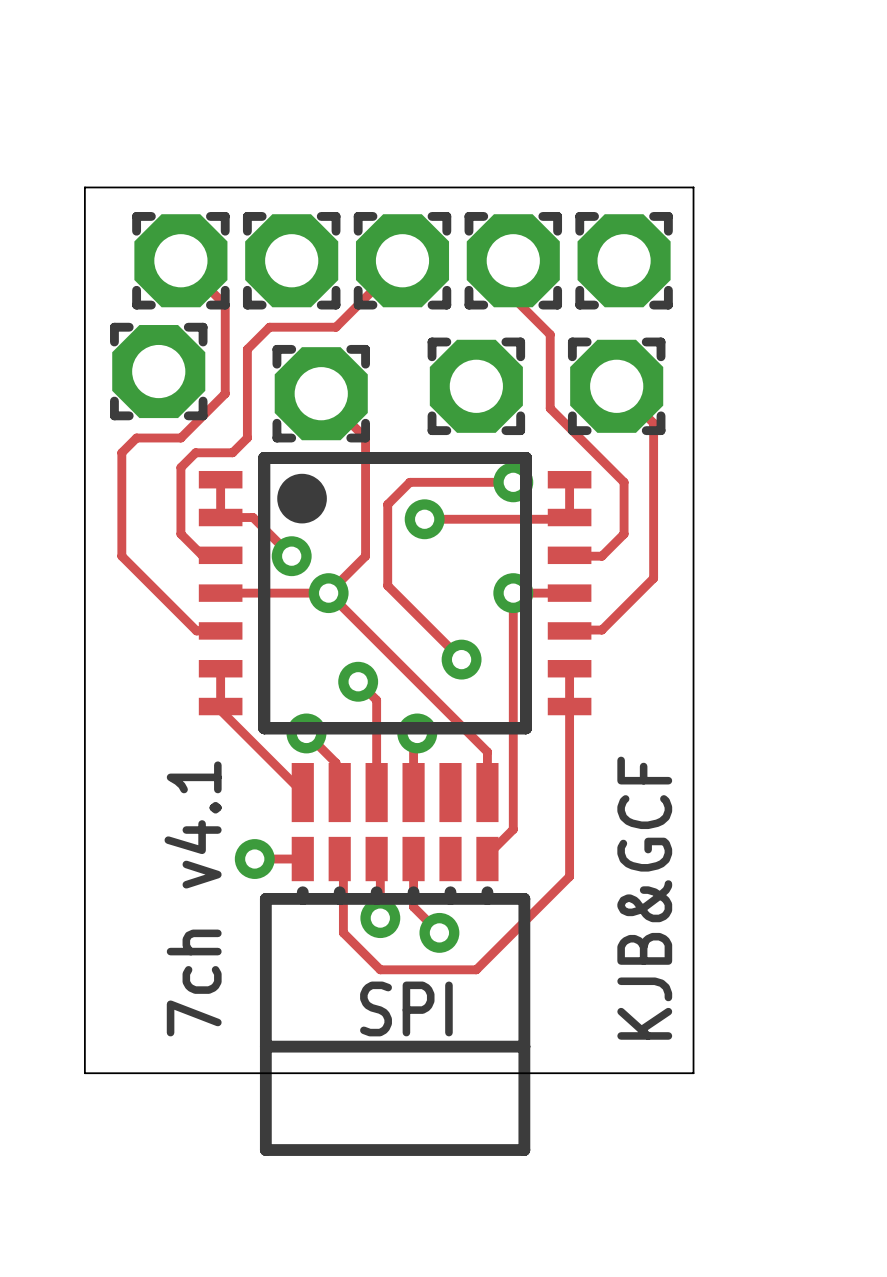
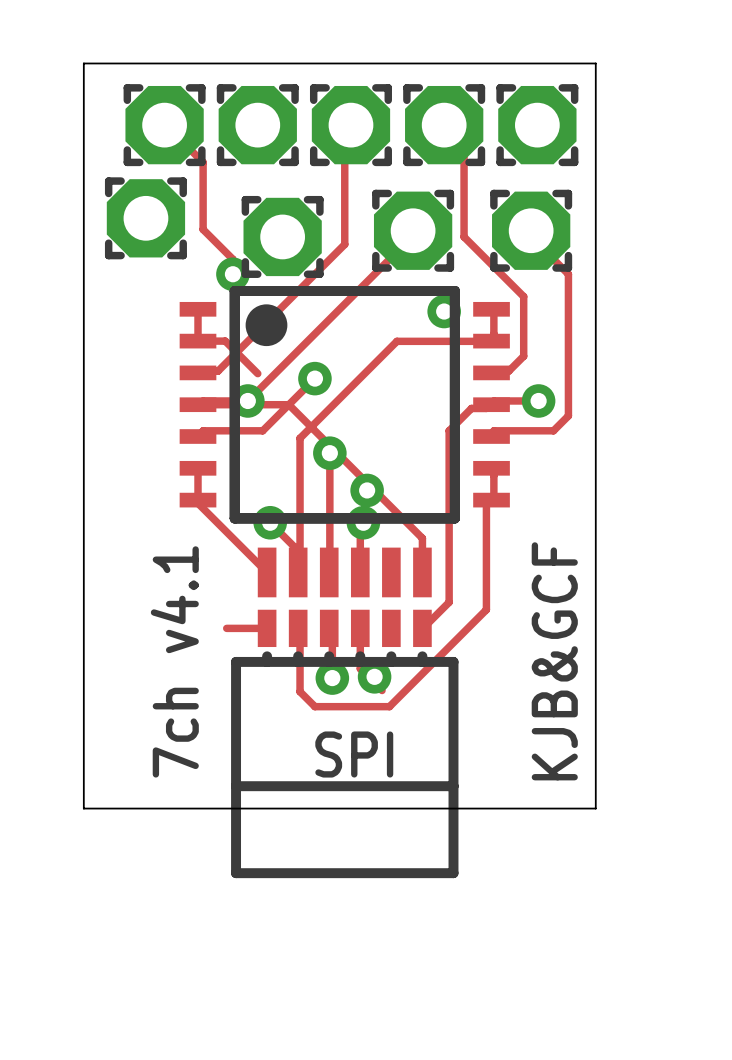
track: (180, 260) (225, 305) (225, 393) (180, 438) (136, 438) (121, 452) (121, 556) (196, 630) (219, 630) -> (164, 125) (203, 162) (203, 229) (232, 259) (232, 274)
track: (402, 260) (336, 327) (269, 327) (247, 349) (247, 438) (232, 452) (195, 452) (180, 467) (180, 534) (202, 555) (219, 556) -> (350, 125) (344, 125) (344, 244) (218, 371) (198, 372)
track: (513, 260) (513, 297) (550, 334) (550, 408) (624, 482) (624, 534) (601, 556) (569, 555) -> (444, 125) (449, 125) (464, 140) (464, 236) (523, 296) (523, 356) (508, 371) (493, 371) (491, 372)
track: none -> (413, 230) (411, 236) (247, 400) (203, 400) (198, 404)
track: (616, 386) (653, 423) (653, 578) (601, 630) (569, 630) -> (531, 230) (531, 236) (568, 274) (568, 415) (553, 430) (493, 430) (491, 436)
track: (321, 393) (365, 438) (365, 556) (359, 562) -> none
via: none -> (232, 274)
track: (569, 479) (569, 519) (424, 519) -> (491, 309) (493, 311) (493, 333) (491, 341) (396, 341) (300, 438) (300, 572) (298, 572)
track: (513, 482) (409, 482) (387, 504) (387, 585) (461, 659) -> none
via: (424, 519) -> none
via position: (291, 556) -> (247, 400)
via: none -> (538, 400)
track: none -> (288, 404) (262, 430) (203, 430) (198, 436)
via position: (328, 593) -> (314, 378)
via: (513, 593) -> none
track: (569, 593) (513, 593) (513, 829) (491, 851) (491, 859) (487, 859) -> (538, 400) (493, 400) (486, 408) (471, 408) (449, 430) (449, 602) (422, 628)
via position: (461, 659) -> (367, 490)
track: (569, 668) (569, 876) (476, 969) (380, 969) (343, 932) (343, 859) (339, 859) -> (491, 468) (493, 475) (493, 497) (486, 505) (486, 609) (389, 706) (314, 706) (300, 691) (300, 632) (298, 628)
track: (358, 681) (376, 700) (376, 792) -> (329, 453) (329, 572)
via position: (358, 681) -> (329, 453)
via: (254, 859) -> none
via position: (439, 932) -> (374, 676)

